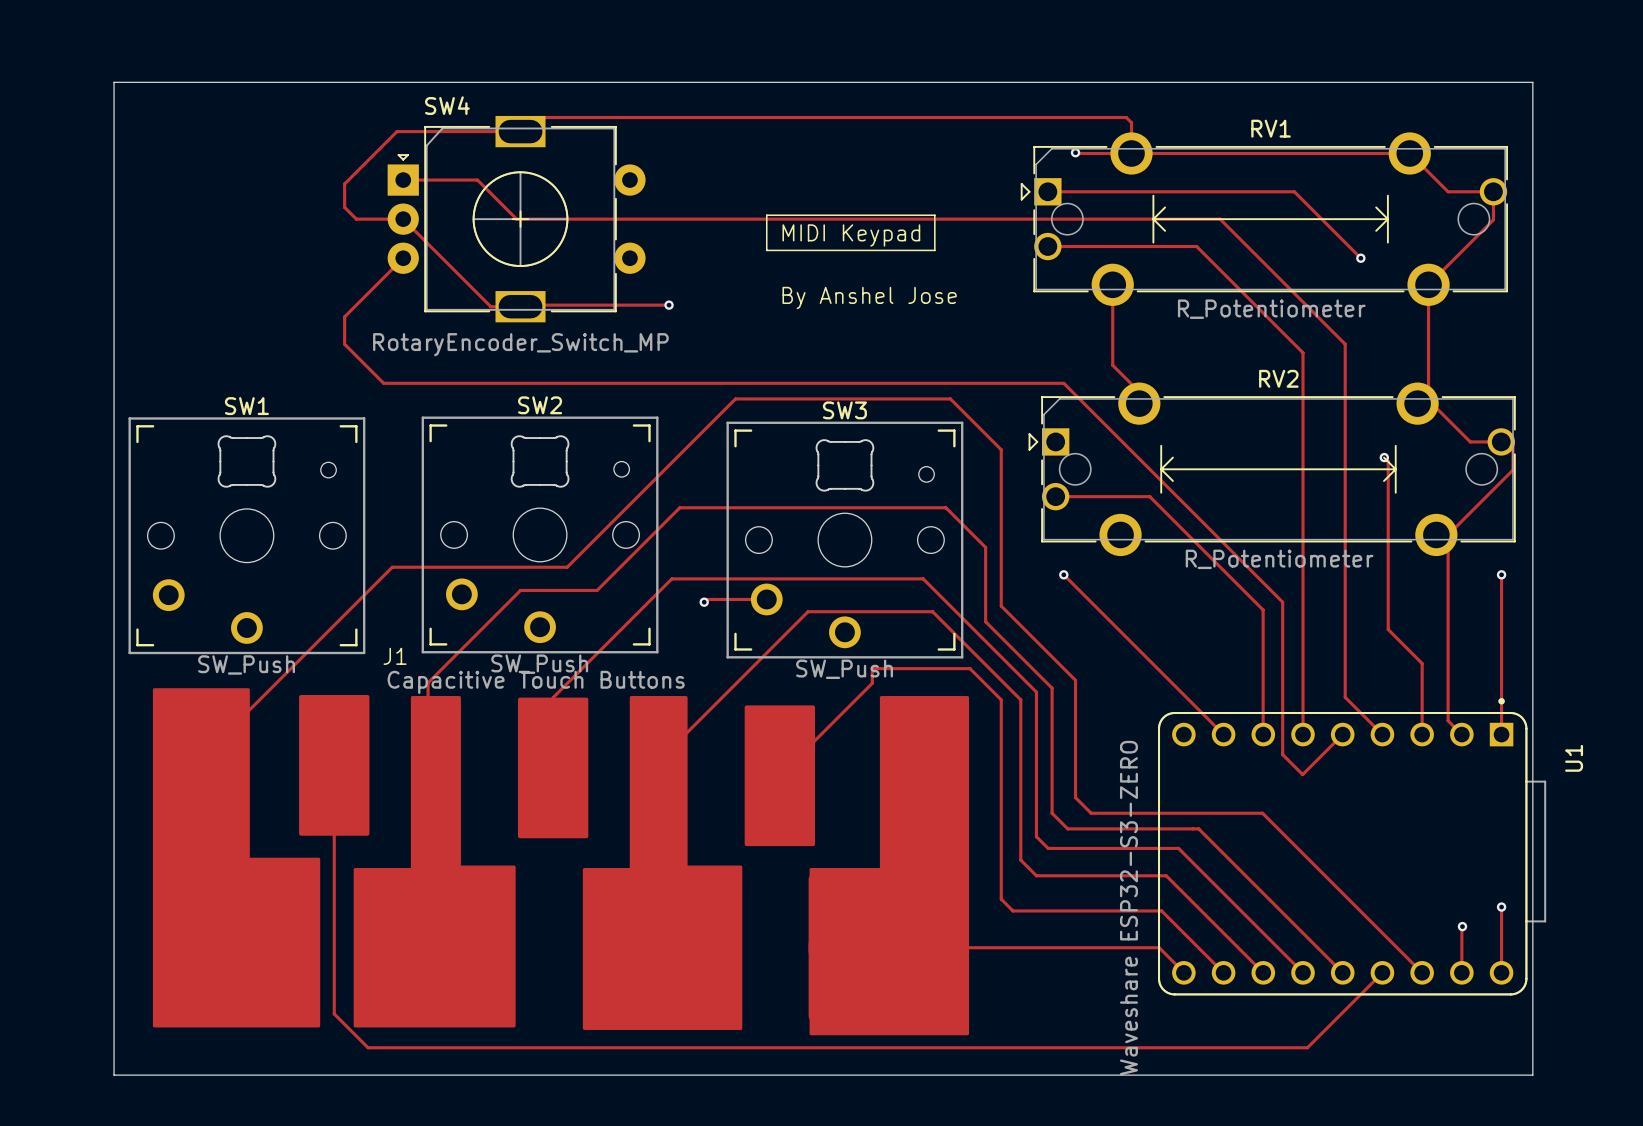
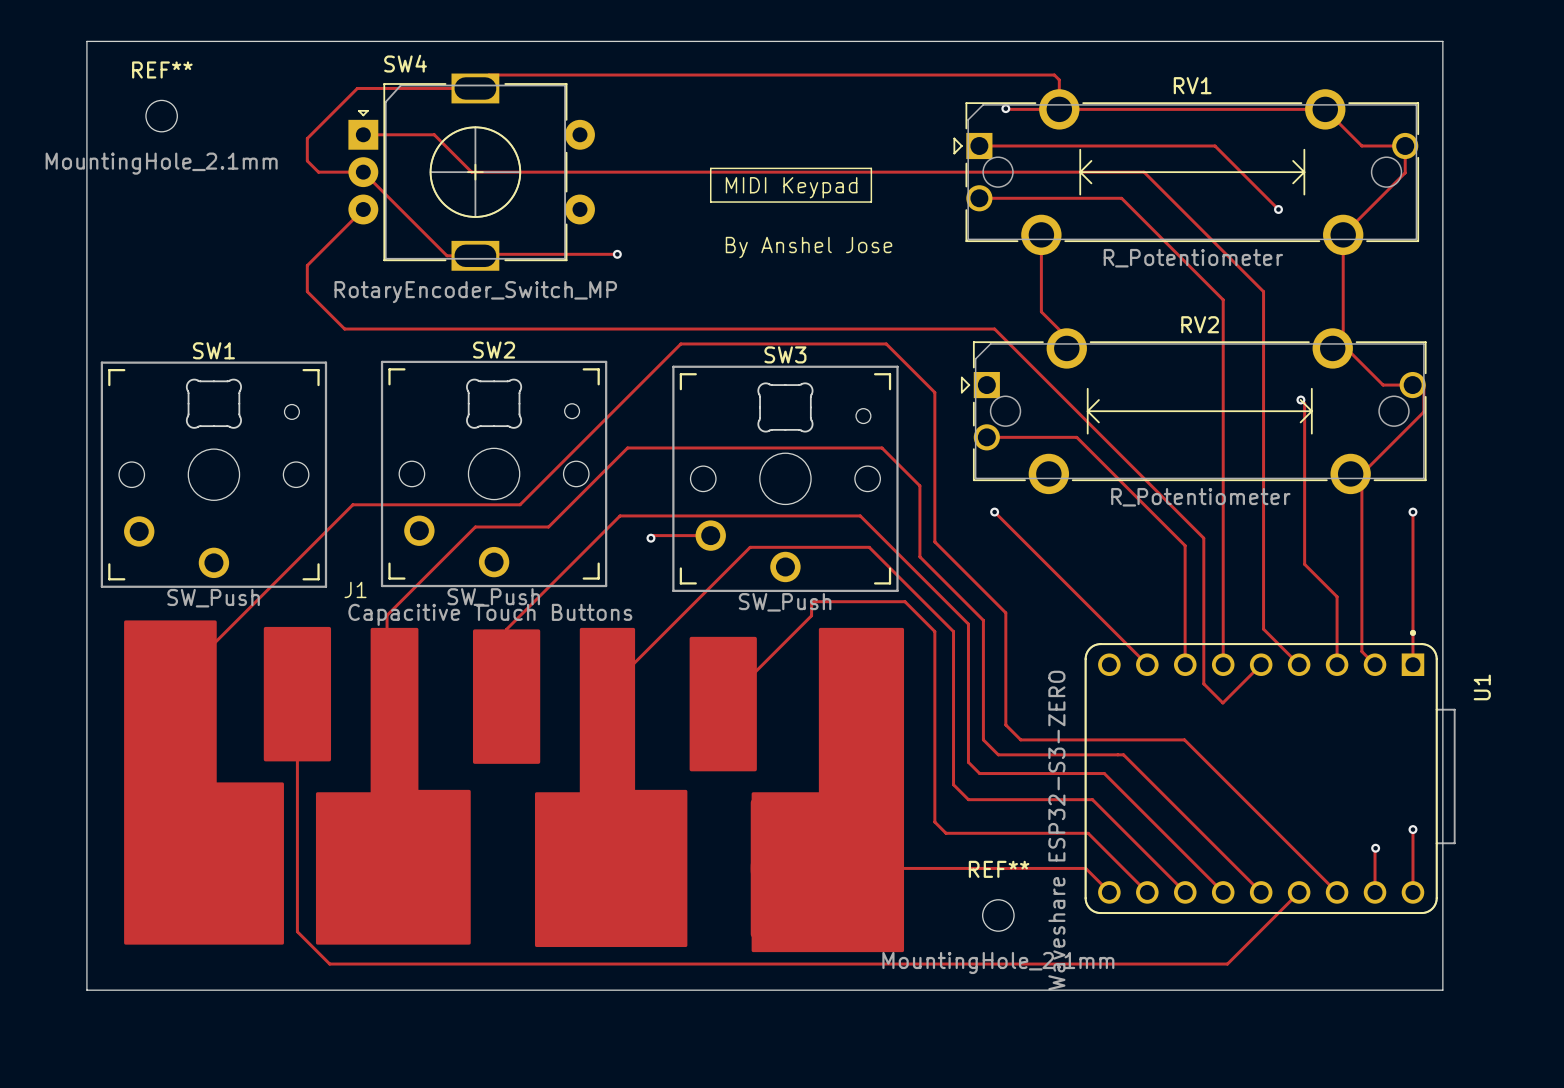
REF**: none -> MountingHole_2.1mm (161, 116)
REF**: none -> MountingHole_2.1mm (998, 915)

